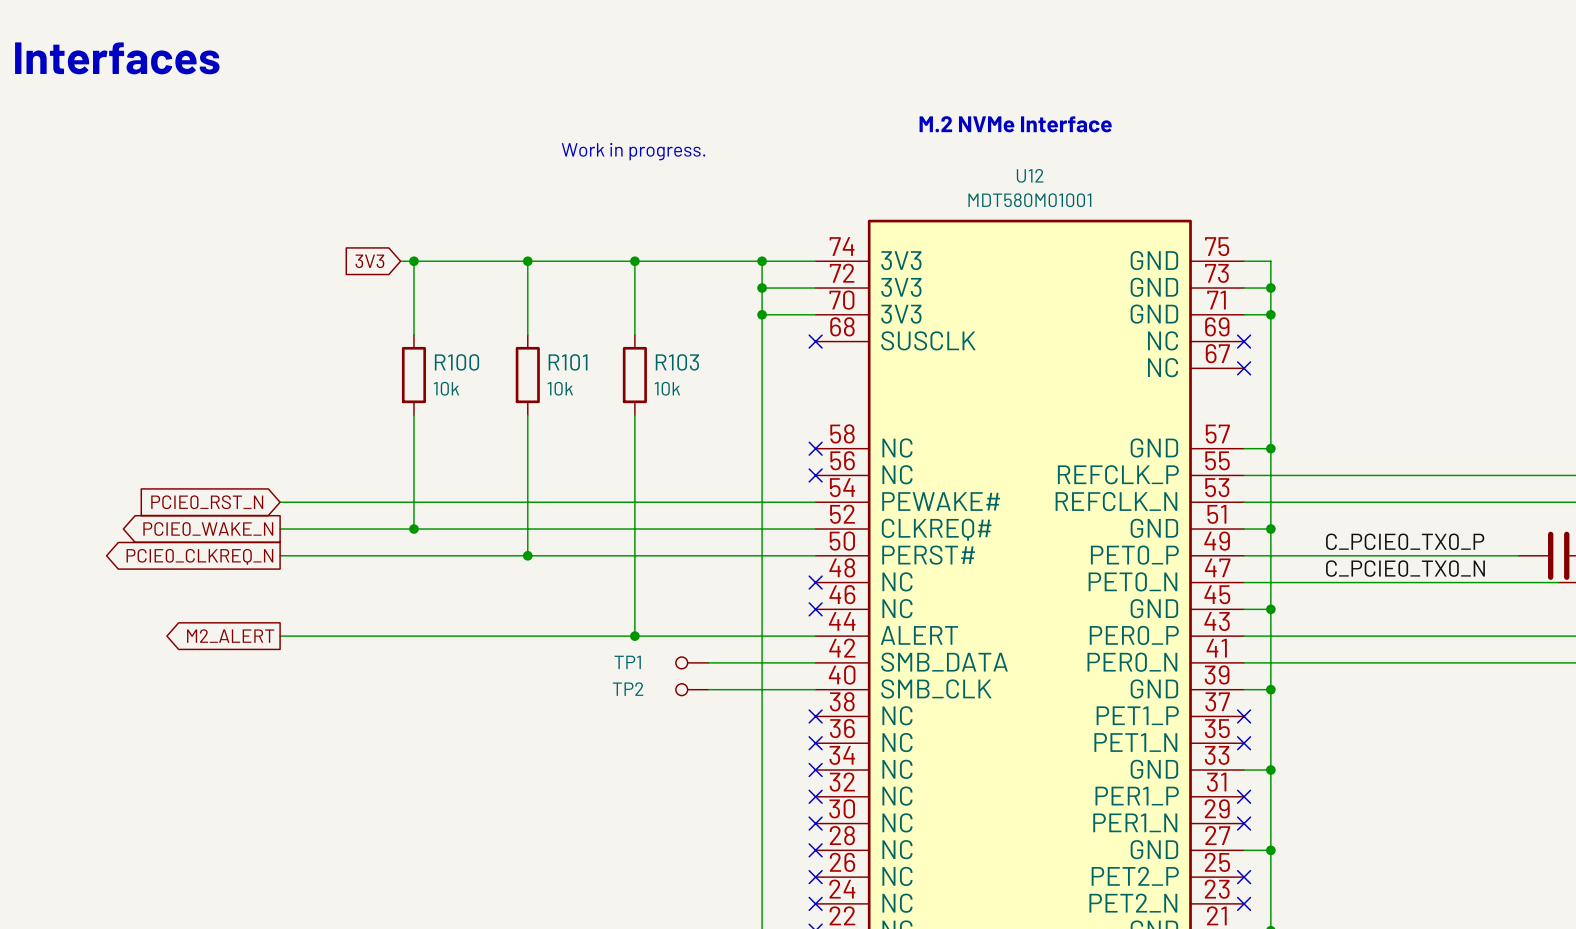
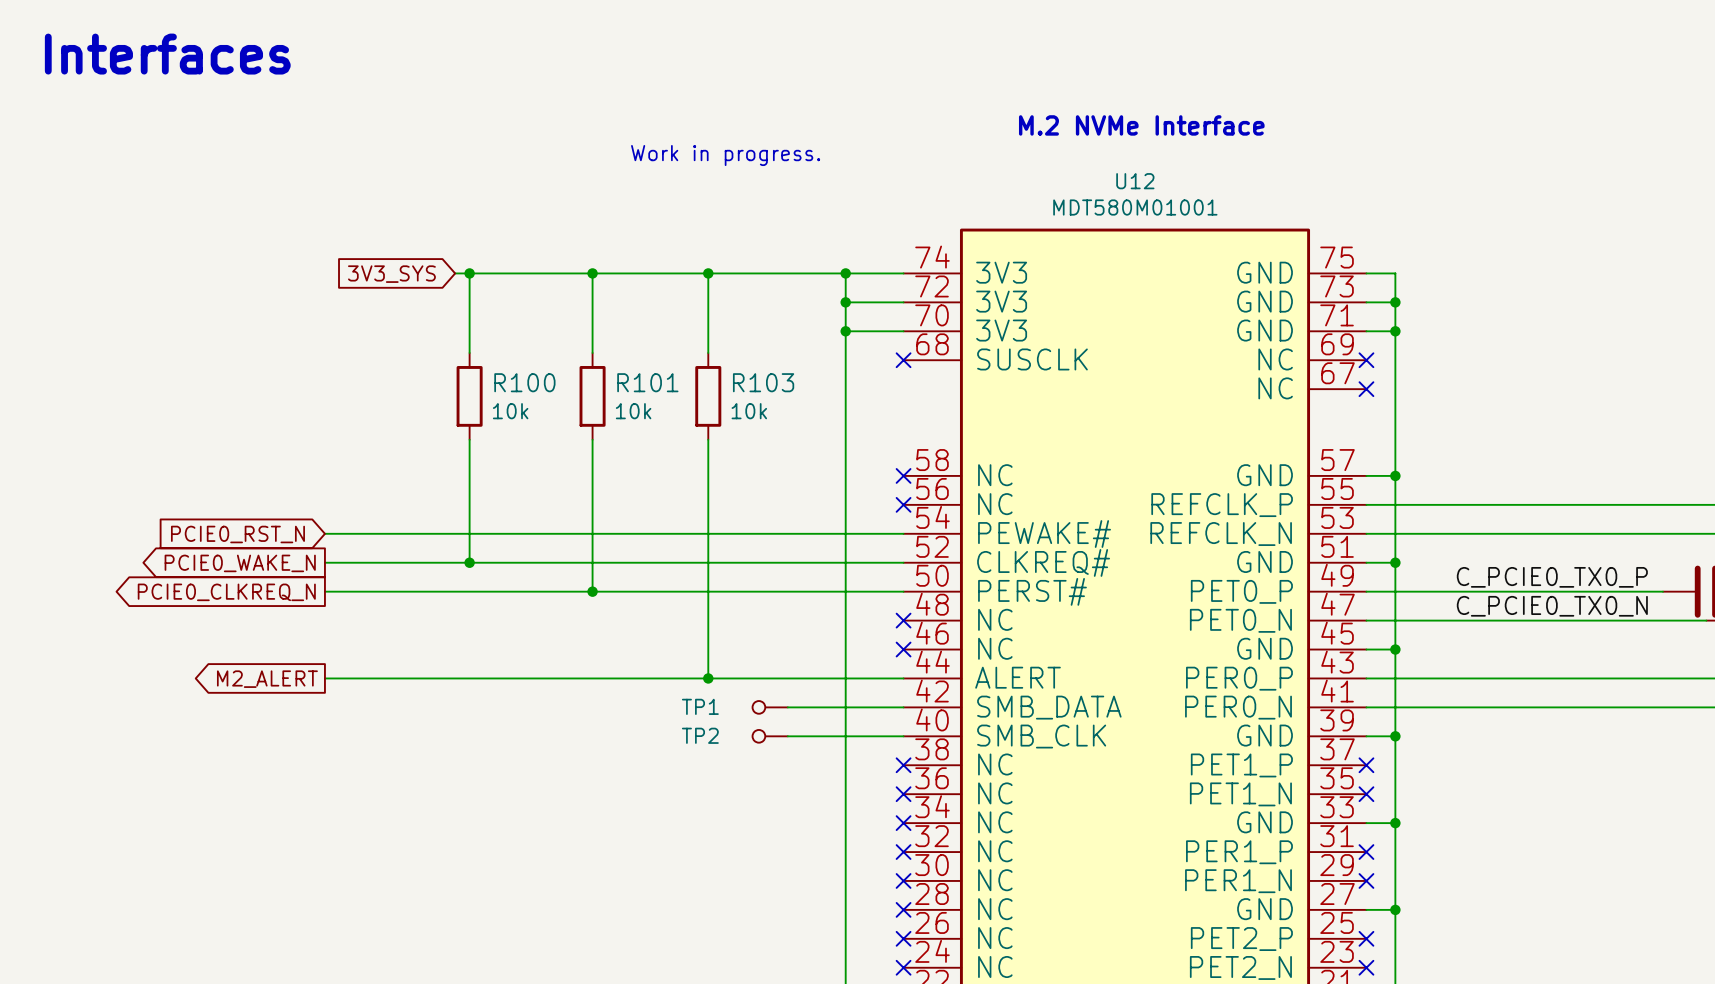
global label: 3V3 (369, 261) -> 3V3_SYS (391, 274)

